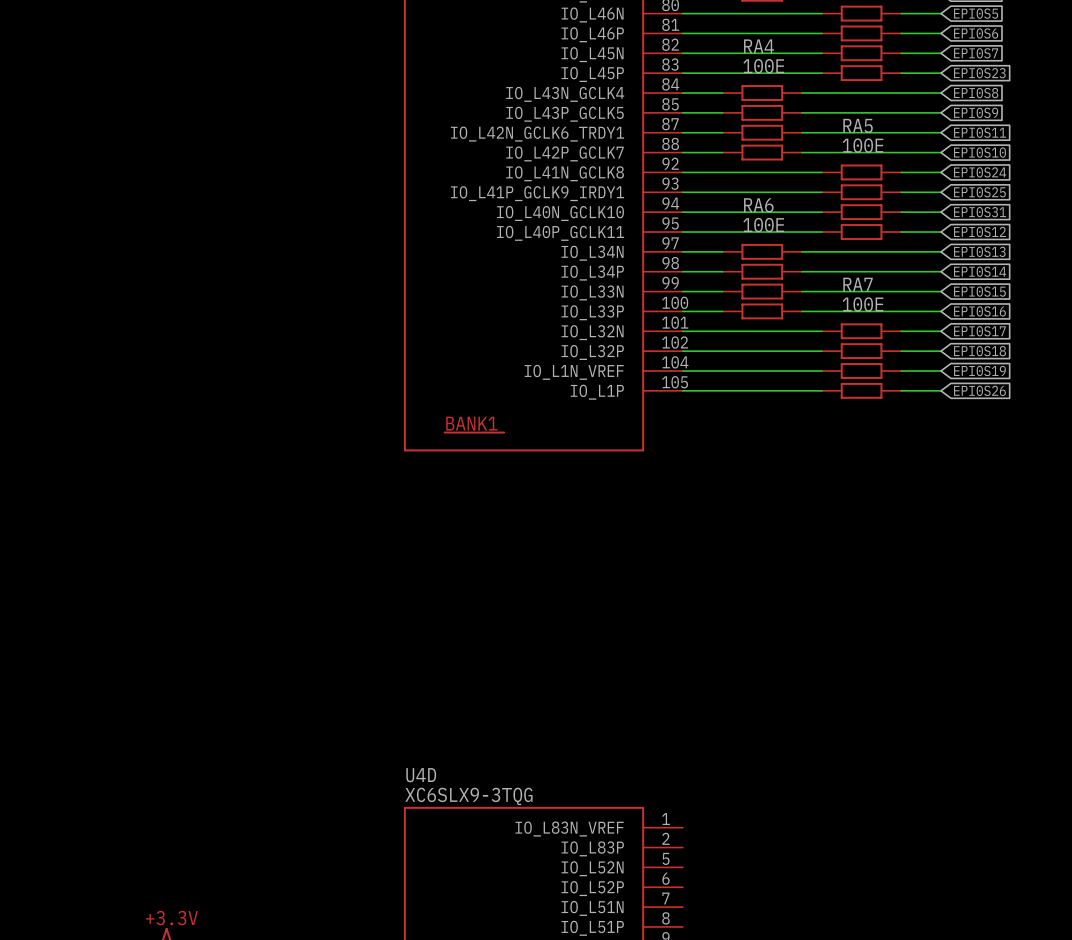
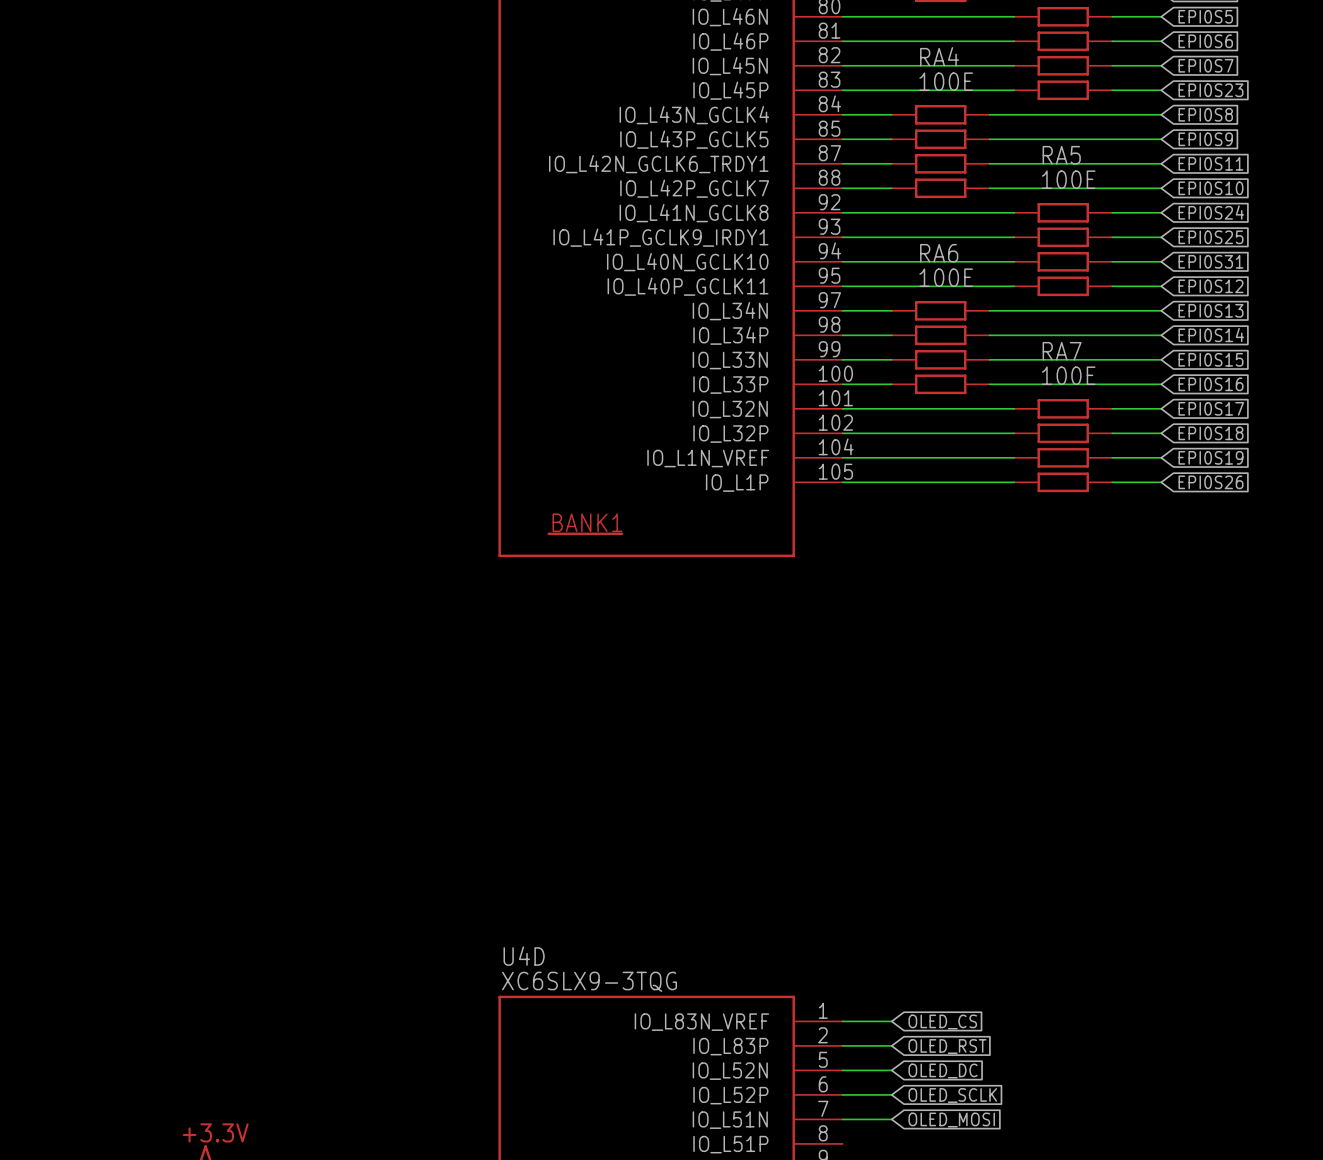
wire: none -> (842, 1021) (891, 1021)
global label: none -> OLED_CS (942, 1022)
wire: none -> (842, 1045) (891, 1045)
global label: none -> OLED_RST (947, 1046)
wire: none -> (842, 1070) (891, 1070)
global label: none -> OLED_DC (943, 1071)
wire: none -> (842, 1094) (891, 1094)
global label: none -> OLED_SCLK (952, 1095)
wire: none -> (842, 1119) (891, 1119)
global label: none -> OLED_MOSI (951, 1120)

